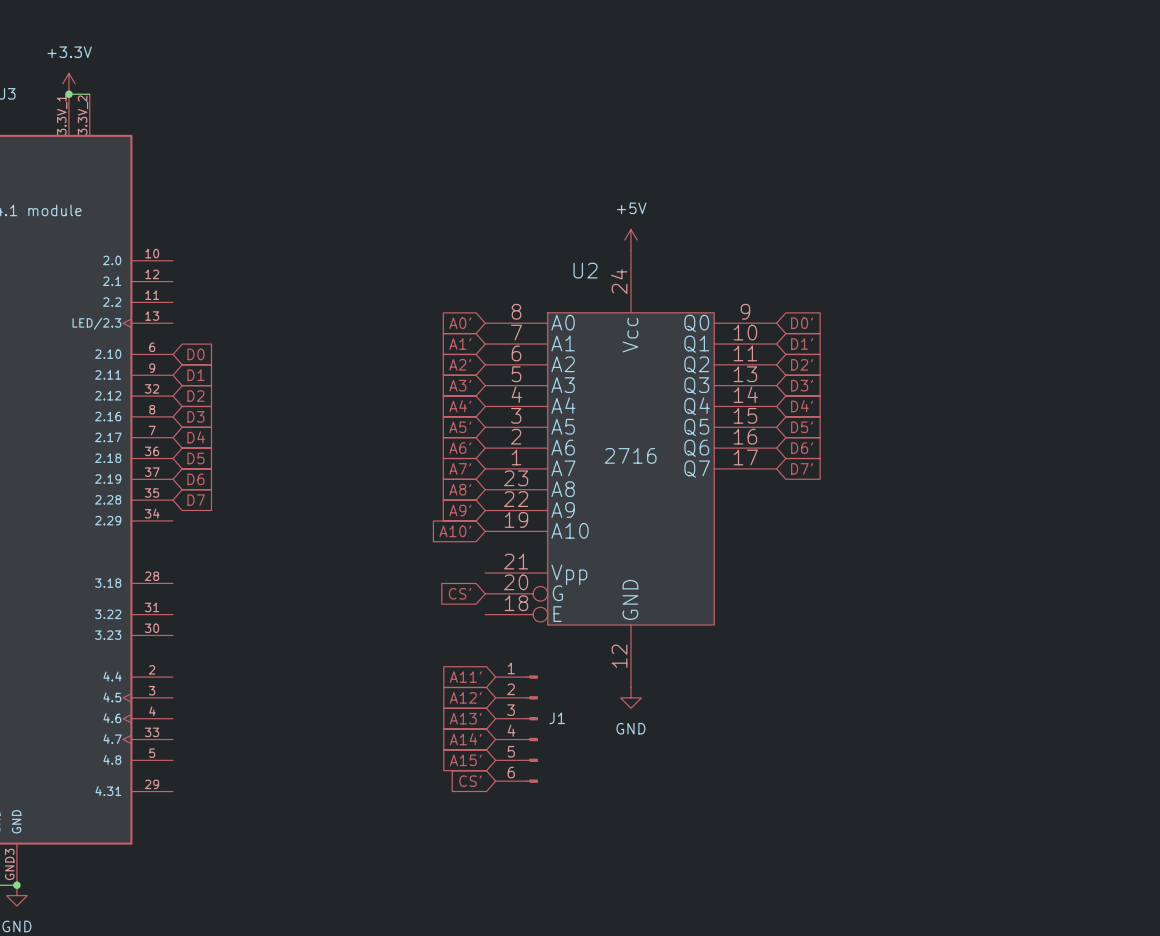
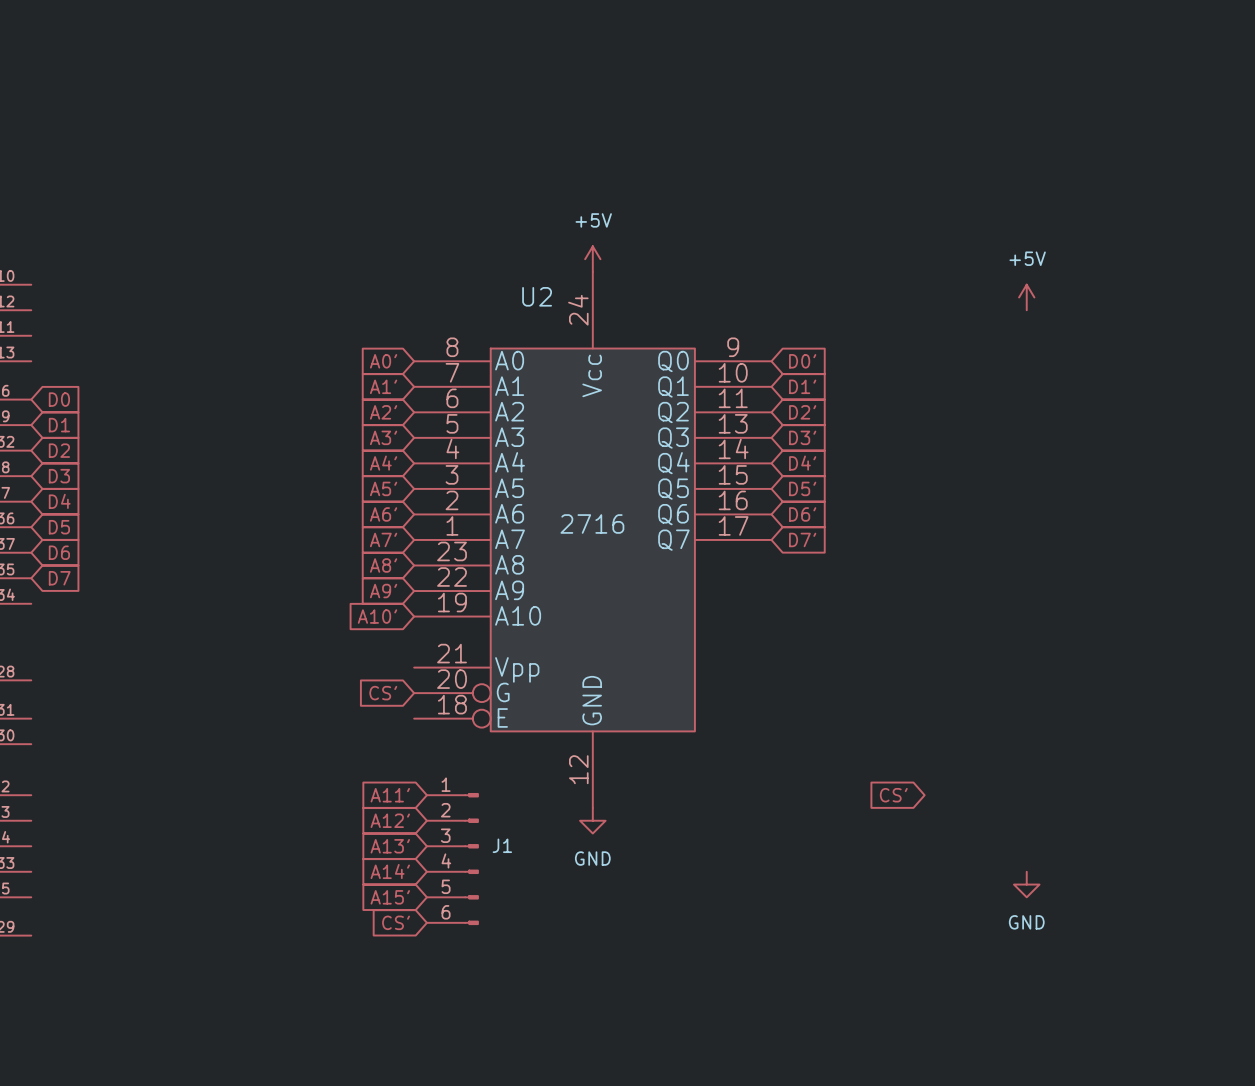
power symbol: none -> +5V (1026, 297)
global label: none -> CS' (893, 795)
power symbol: none -> GND (1026, 884)

